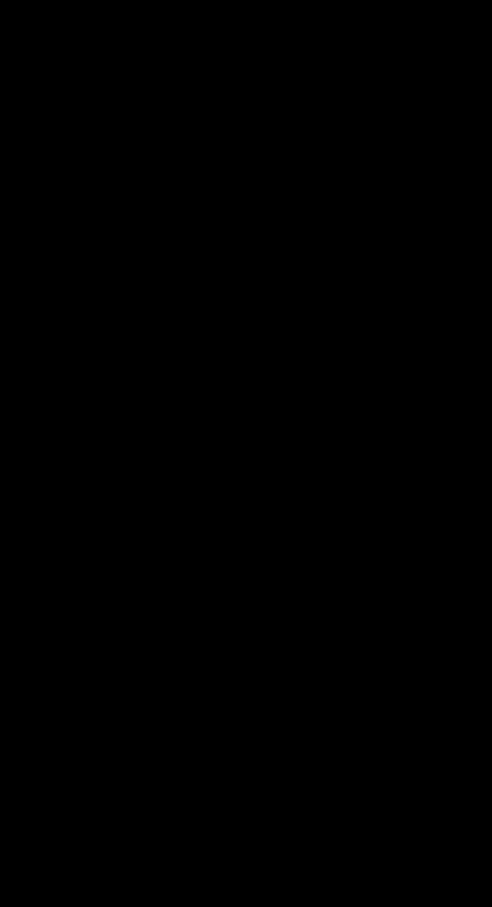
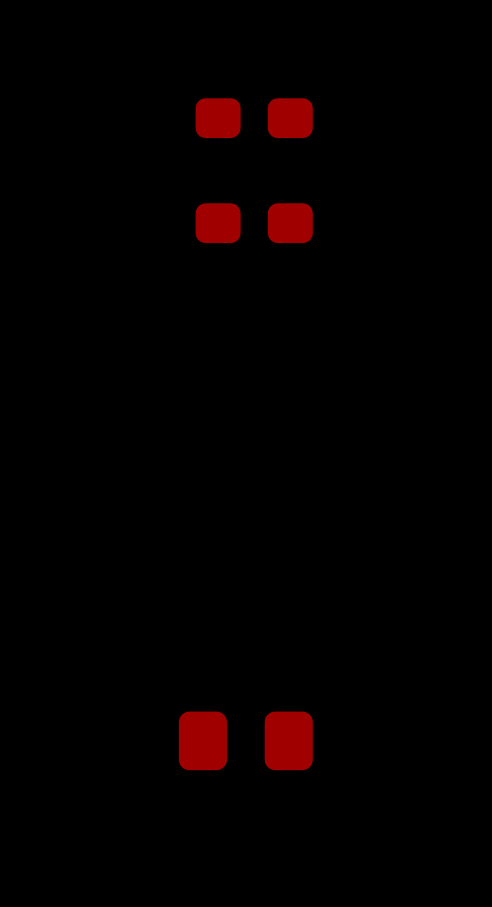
part: none -> (254, 118)
part: none -> (254, 223)
part: none -> (245, 740)

